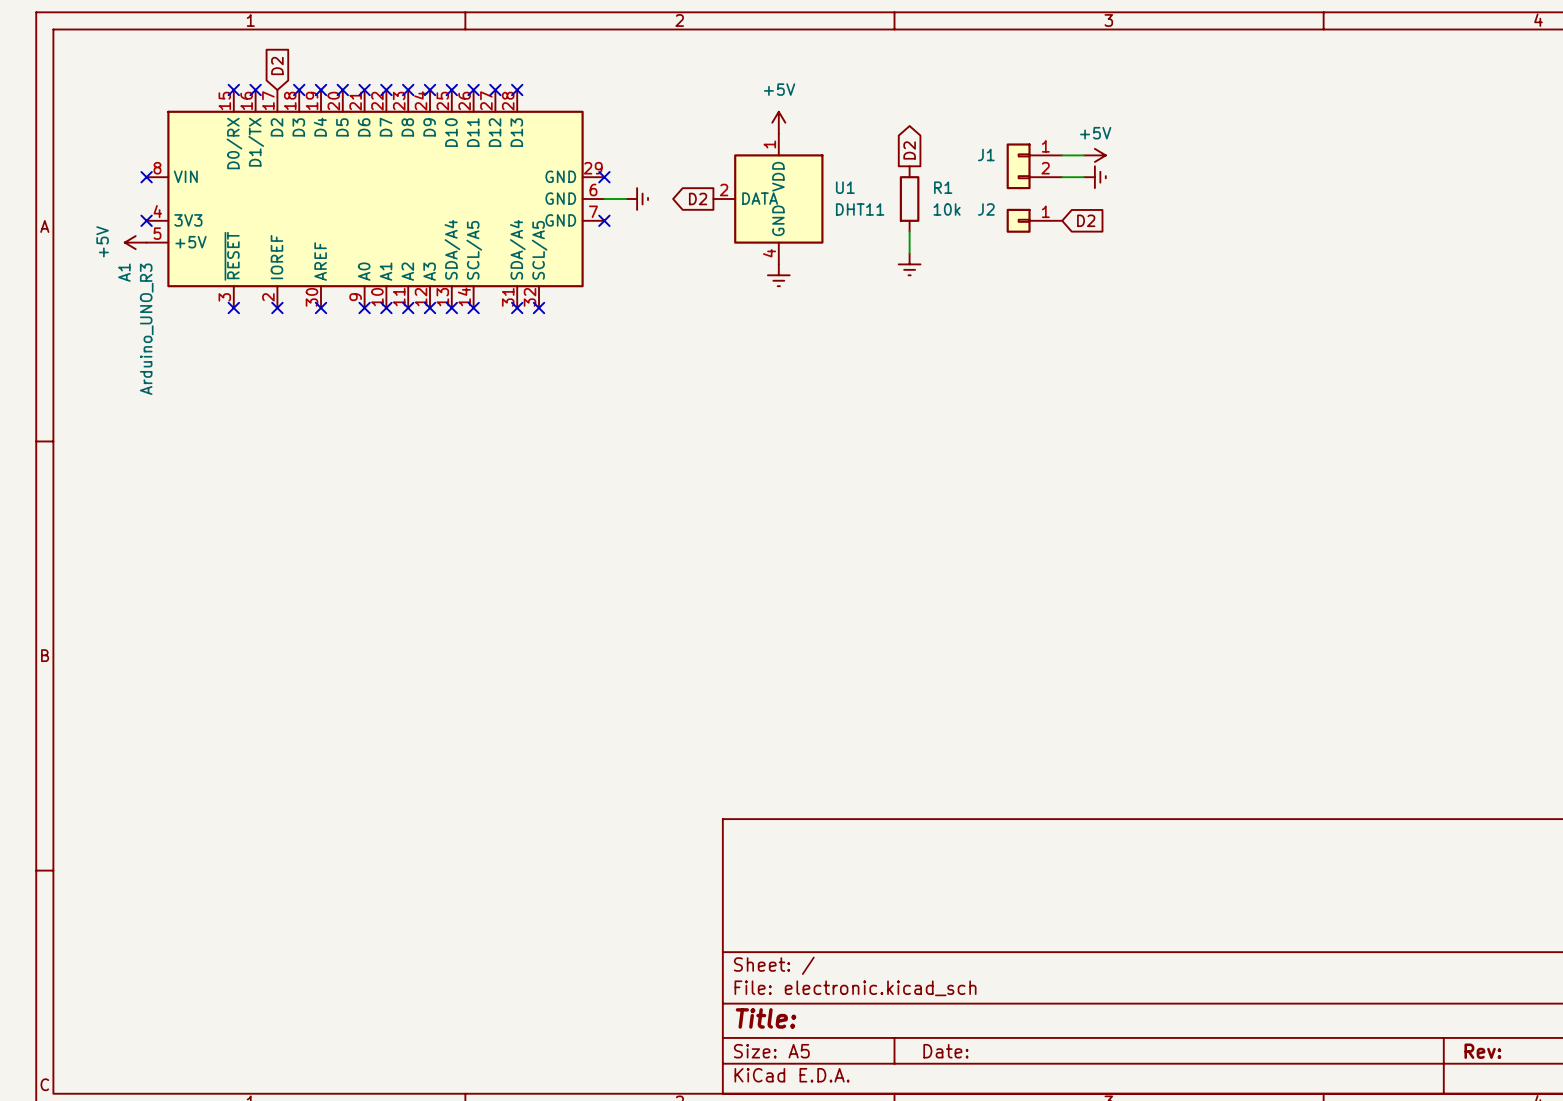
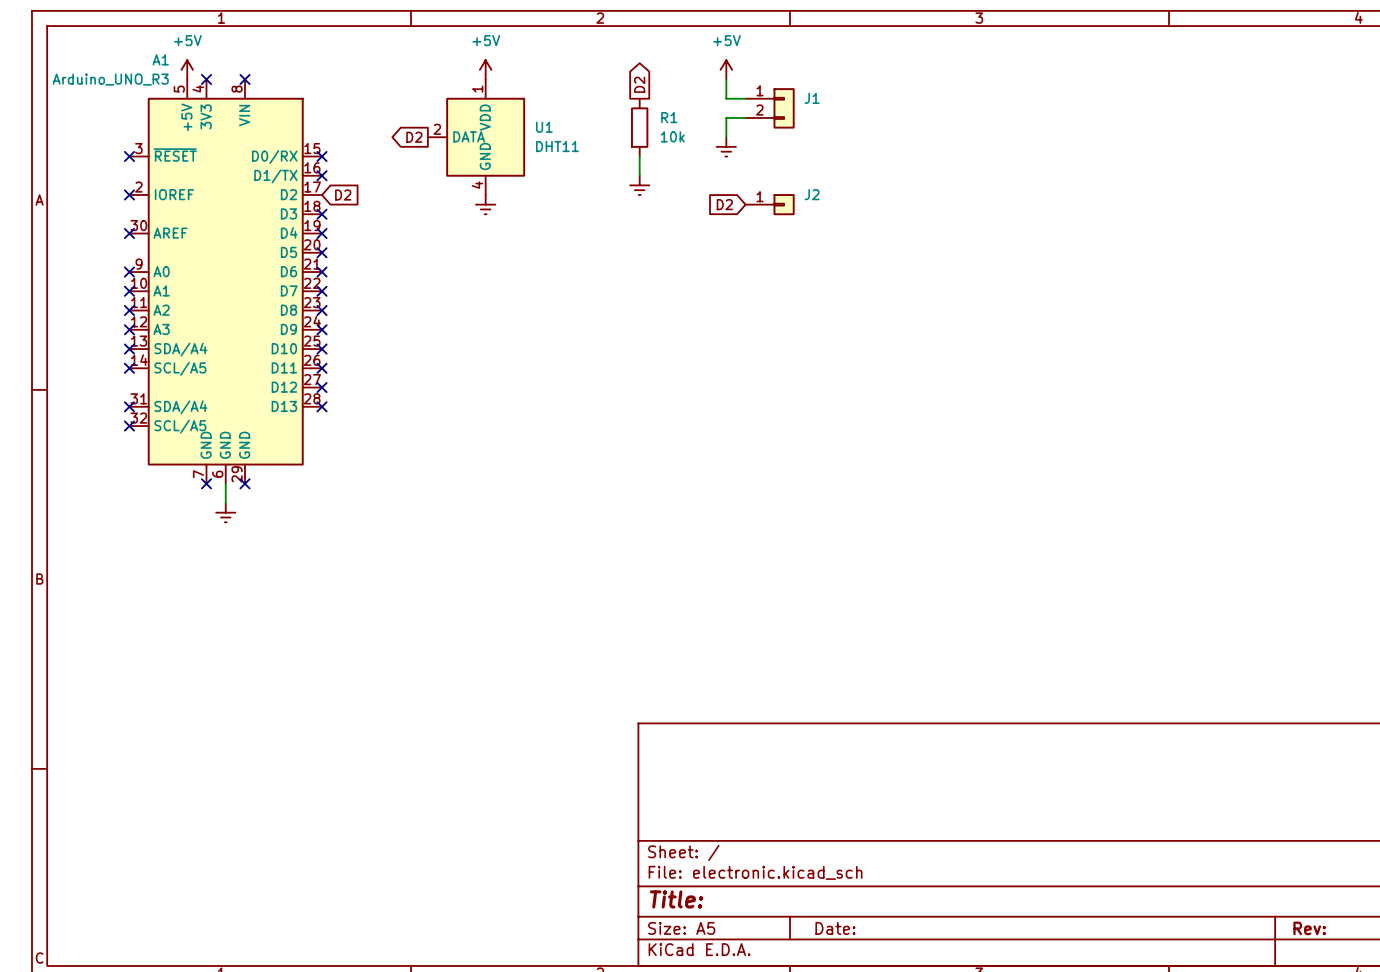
global label: D2 (277, 65) -> none
power symbol: none -> +5V (485, 69)
no-connect mark: (255, 90) -> none
no-connect mark: none -> (244, 79)
no-connect mark: (299, 90) -> none
no-connect mark: (321, 90) -> none
no-connect mark: (342, 90) -> none
no-connect mark: (364, 90) -> none
no-connect mark: (386, 90) -> none
no-connect mark: (408, 90) -> none
no-connect mark: (430, 90) -> none
no-connect mark: (451, 90) -> none
no-connect mark: (473, 90) -> none
no-connect mark: (495, 90) -> none
no-connect mark: (517, 90) -> none
wire: none -> (726, 79) (726, 98) (745, 98)
global label: none -> D2 (639, 84)
power symbol position: +5V (778, 122) -> +5V (726, 69)
wire: none -> (745, 117) (726, 117) (726, 137)
global label: D2 (909, 150) -> none
global label: none -> D2 (414, 137)
wire: (1062, 155) (1084, 155) -> none
power symbol: +5V (1094, 155) -> none
power symbol: none -> (726, 146)
J1 flip: as is (1018, 166) -> left-right (784, 108)
J1 position: (1034, 166) -> (770, 108)
no-connect mark: none -> (322, 156)
no-connect mark: (604, 177) -> none
wire: (1062, 177) (1084, 177) -> none
power symbol: (1094, 177) -> none
no-connect mark: none -> (322, 175)
A1 rotation: 0° (375, 199) -> 90° clockwise (225, 281)
wire: (604, 199) (626, 199) -> none
power symbol: (637, 199) -> none
global label: D2 (698, 199) -> none
U1 position: (768, 199) -> (476, 137)
R1 position: (909, 199) -> (639, 127)
power symbol: none -> (639, 185)
J2 name position: J2 (986, 209) -> J2 (812, 194)
global label: none -> D2 (343, 195)
no-connect mark: (604, 220) -> none
J2 rotation: 0° (1018, 220) -> 180° (784, 204)
J2 position: (1034, 220) -> (770, 204)
global label: D2 (1086, 220) -> none
power symbol: none -> (485, 204)
global label: none -> D2 (724, 204)
wire: (909, 231) (909, 253) -> (639, 156) (639, 175)
power symbol rotation: 0° (135, 242) -> 90° clockwise (187, 69)
power symbol position: +5V (135, 242) -> +5V (187, 69)
no-connect mark: none -> (322, 214)
no-connect mark: none -> (129, 233)
no-connect mark: none -> (322, 233)
power symbol: (909, 264) -> none
power symbol: (778, 275) -> none
no-connect mark: none -> (322, 252)
no-connect mark: none -> (129, 272)
no-connect mark: (233, 308) -> none
no-connect mark: (277, 308) -> none
no-connect mark: (321, 308) -> none
no-connect mark: (386, 308) -> none
no-connect mark: (408, 308) -> none
no-connect mark: (430, 308) -> none
no-connect mark: (451, 308) -> none
no-connect mark: (473, 308) -> none
no-connect mark: (517, 308) -> none
no-connect mark: (539, 308) -> none
no-connect mark: none -> (129, 291)
no-connect mark: none -> (322, 291)
no-connect mark: none -> (129, 310)
no-connect mark: none -> (322, 310)
no-connect mark: none -> (129, 329)
no-connect mark: none -> (322, 329)
no-connect mark: none -> (129, 349)
no-connect mark: none -> (322, 349)
no-connect mark: none -> (129, 368)
no-connect mark: none -> (322, 368)
no-connect mark: none -> (322, 387)
no-connect mark: none -> (129, 406)
no-connect mark: none -> (322, 406)
no-connect mark: none -> (129, 426)
no-connect mark: none -> (206, 483)
wire: none -> (225, 483) (225, 503)
no-connect mark: none -> (244, 483)
power symbol: none -> (225, 512)

